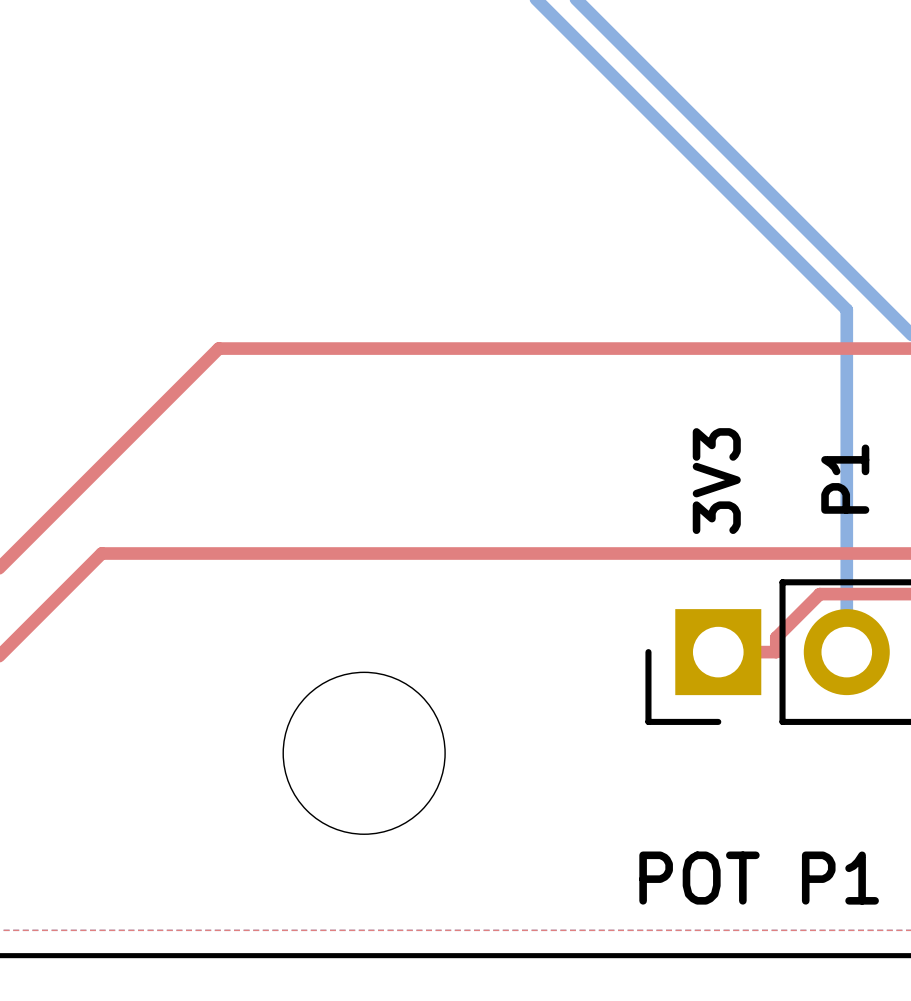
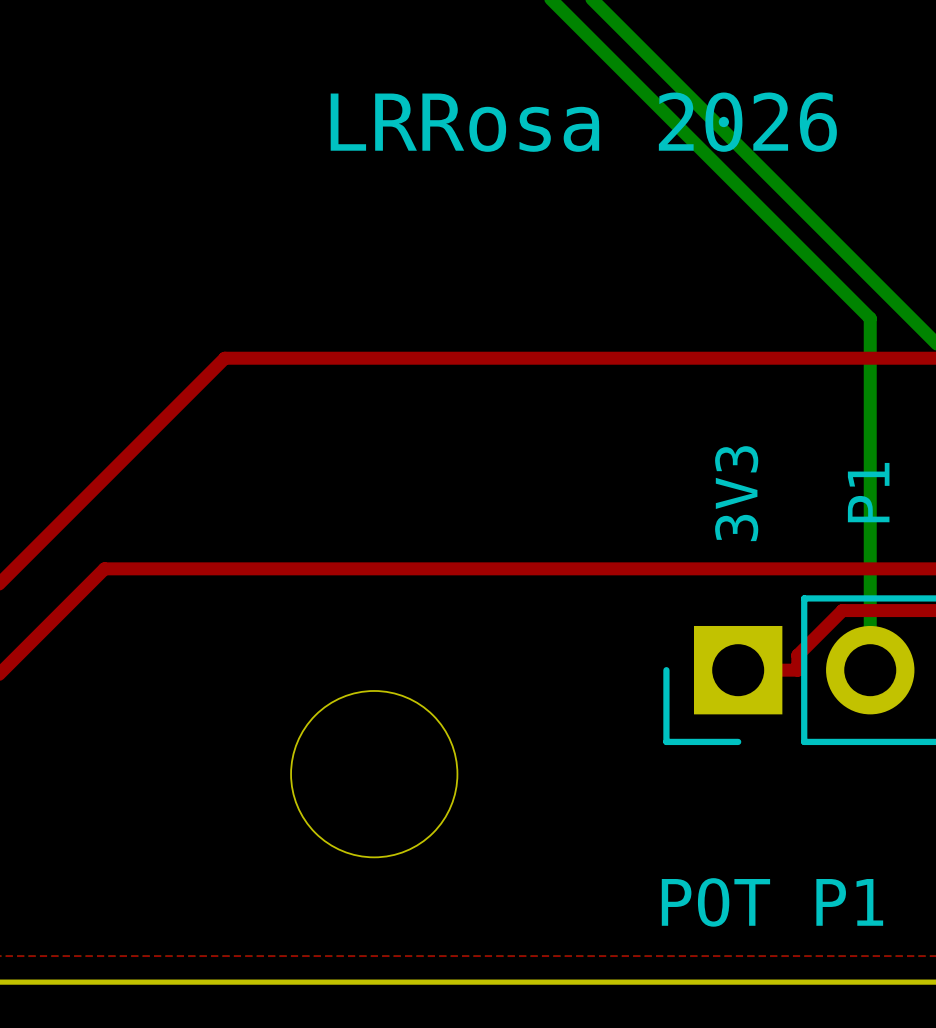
text: none -> LRRosa 2026 (583, 122)

